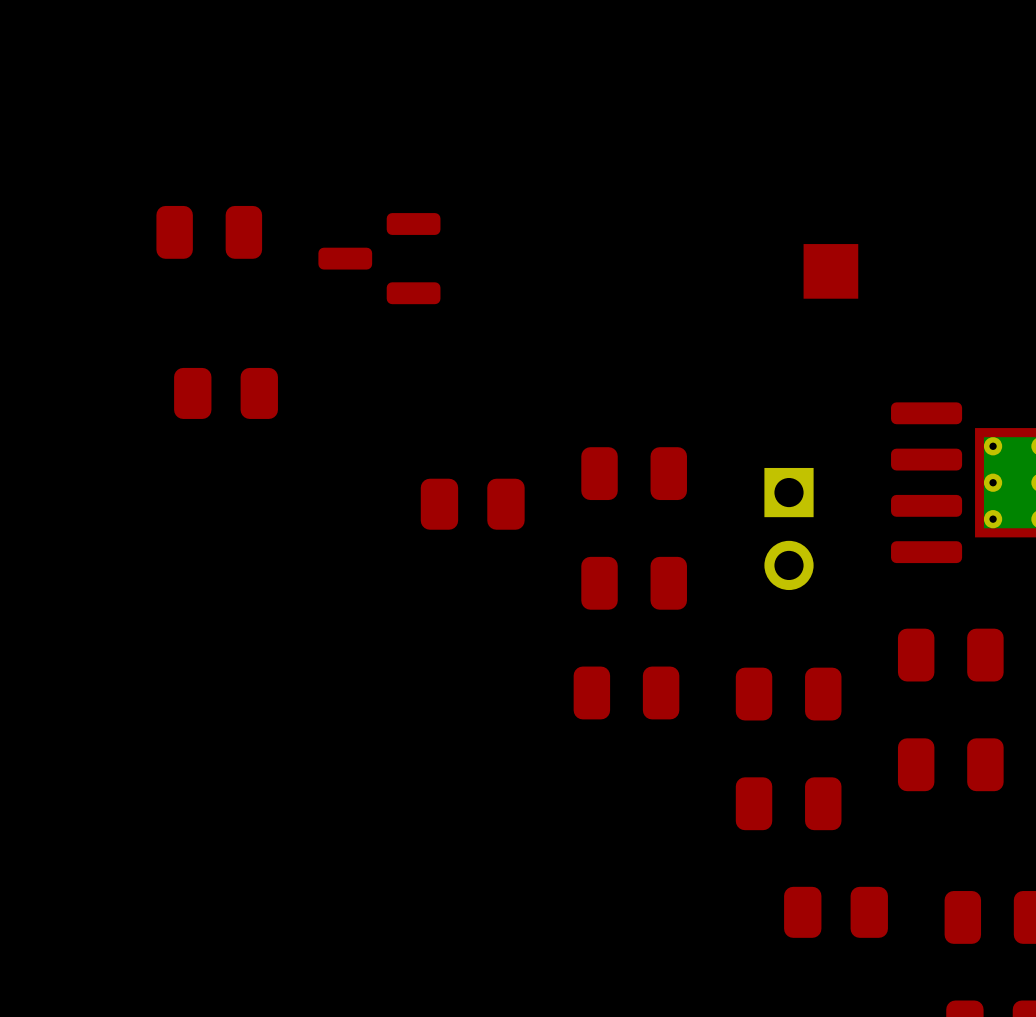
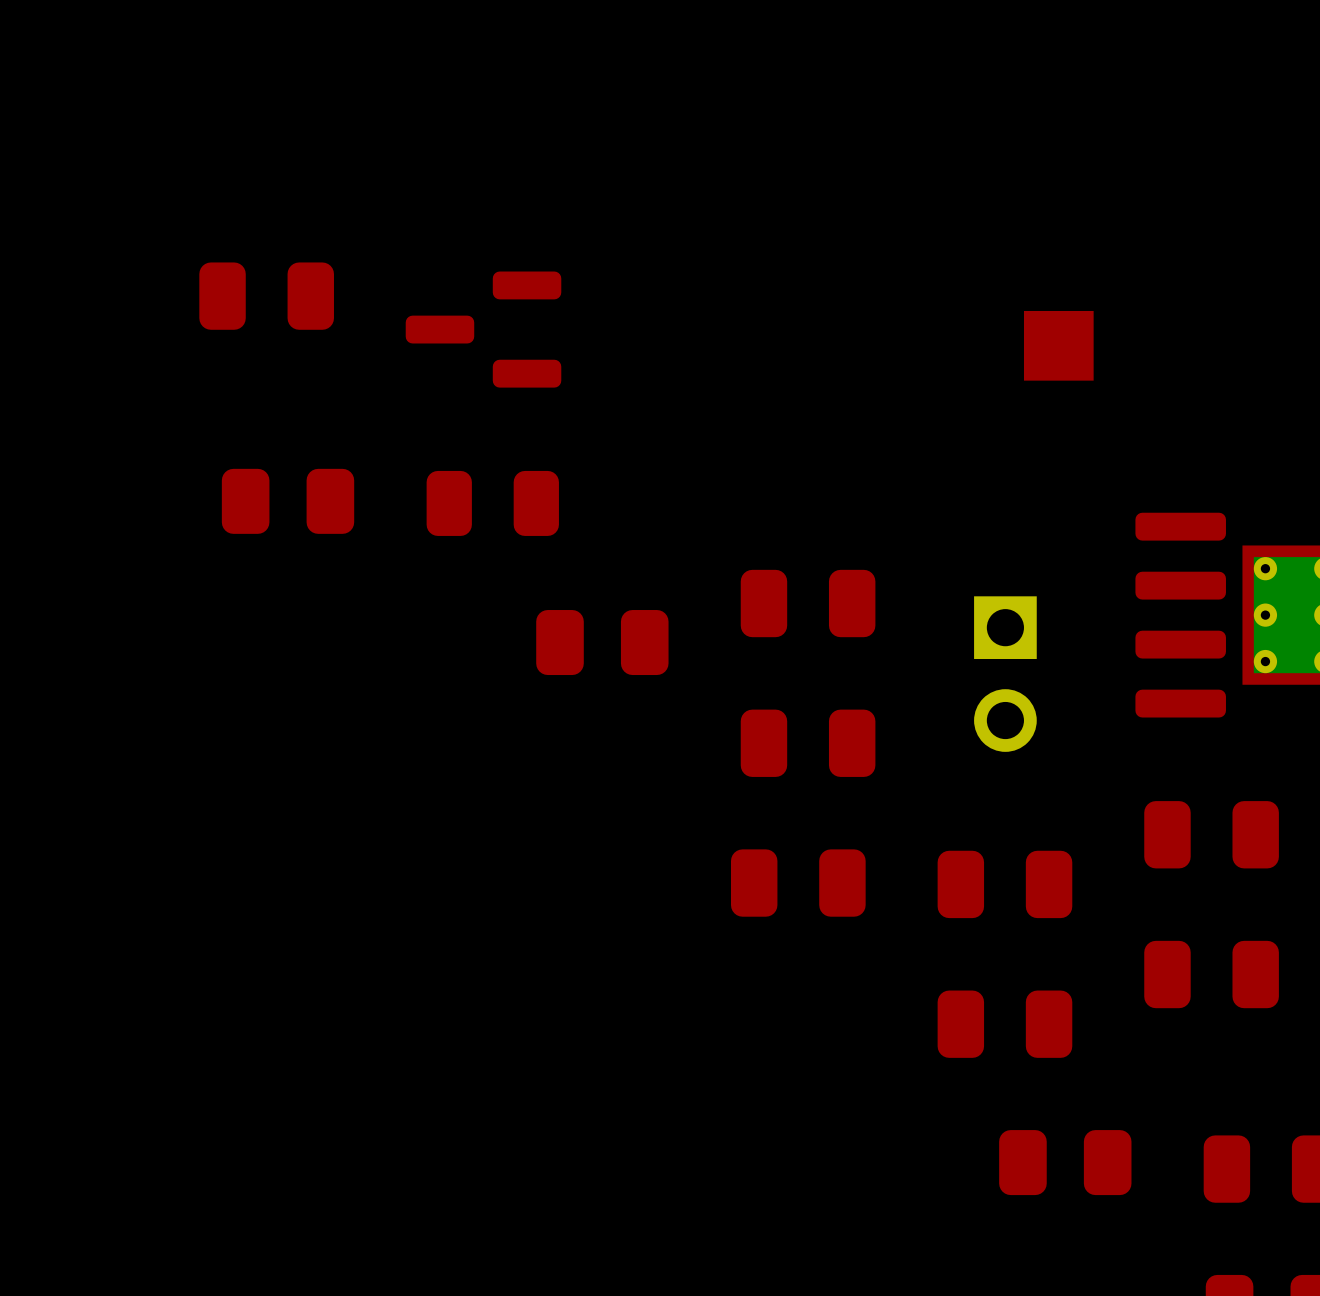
part: none -> (492, 503)

